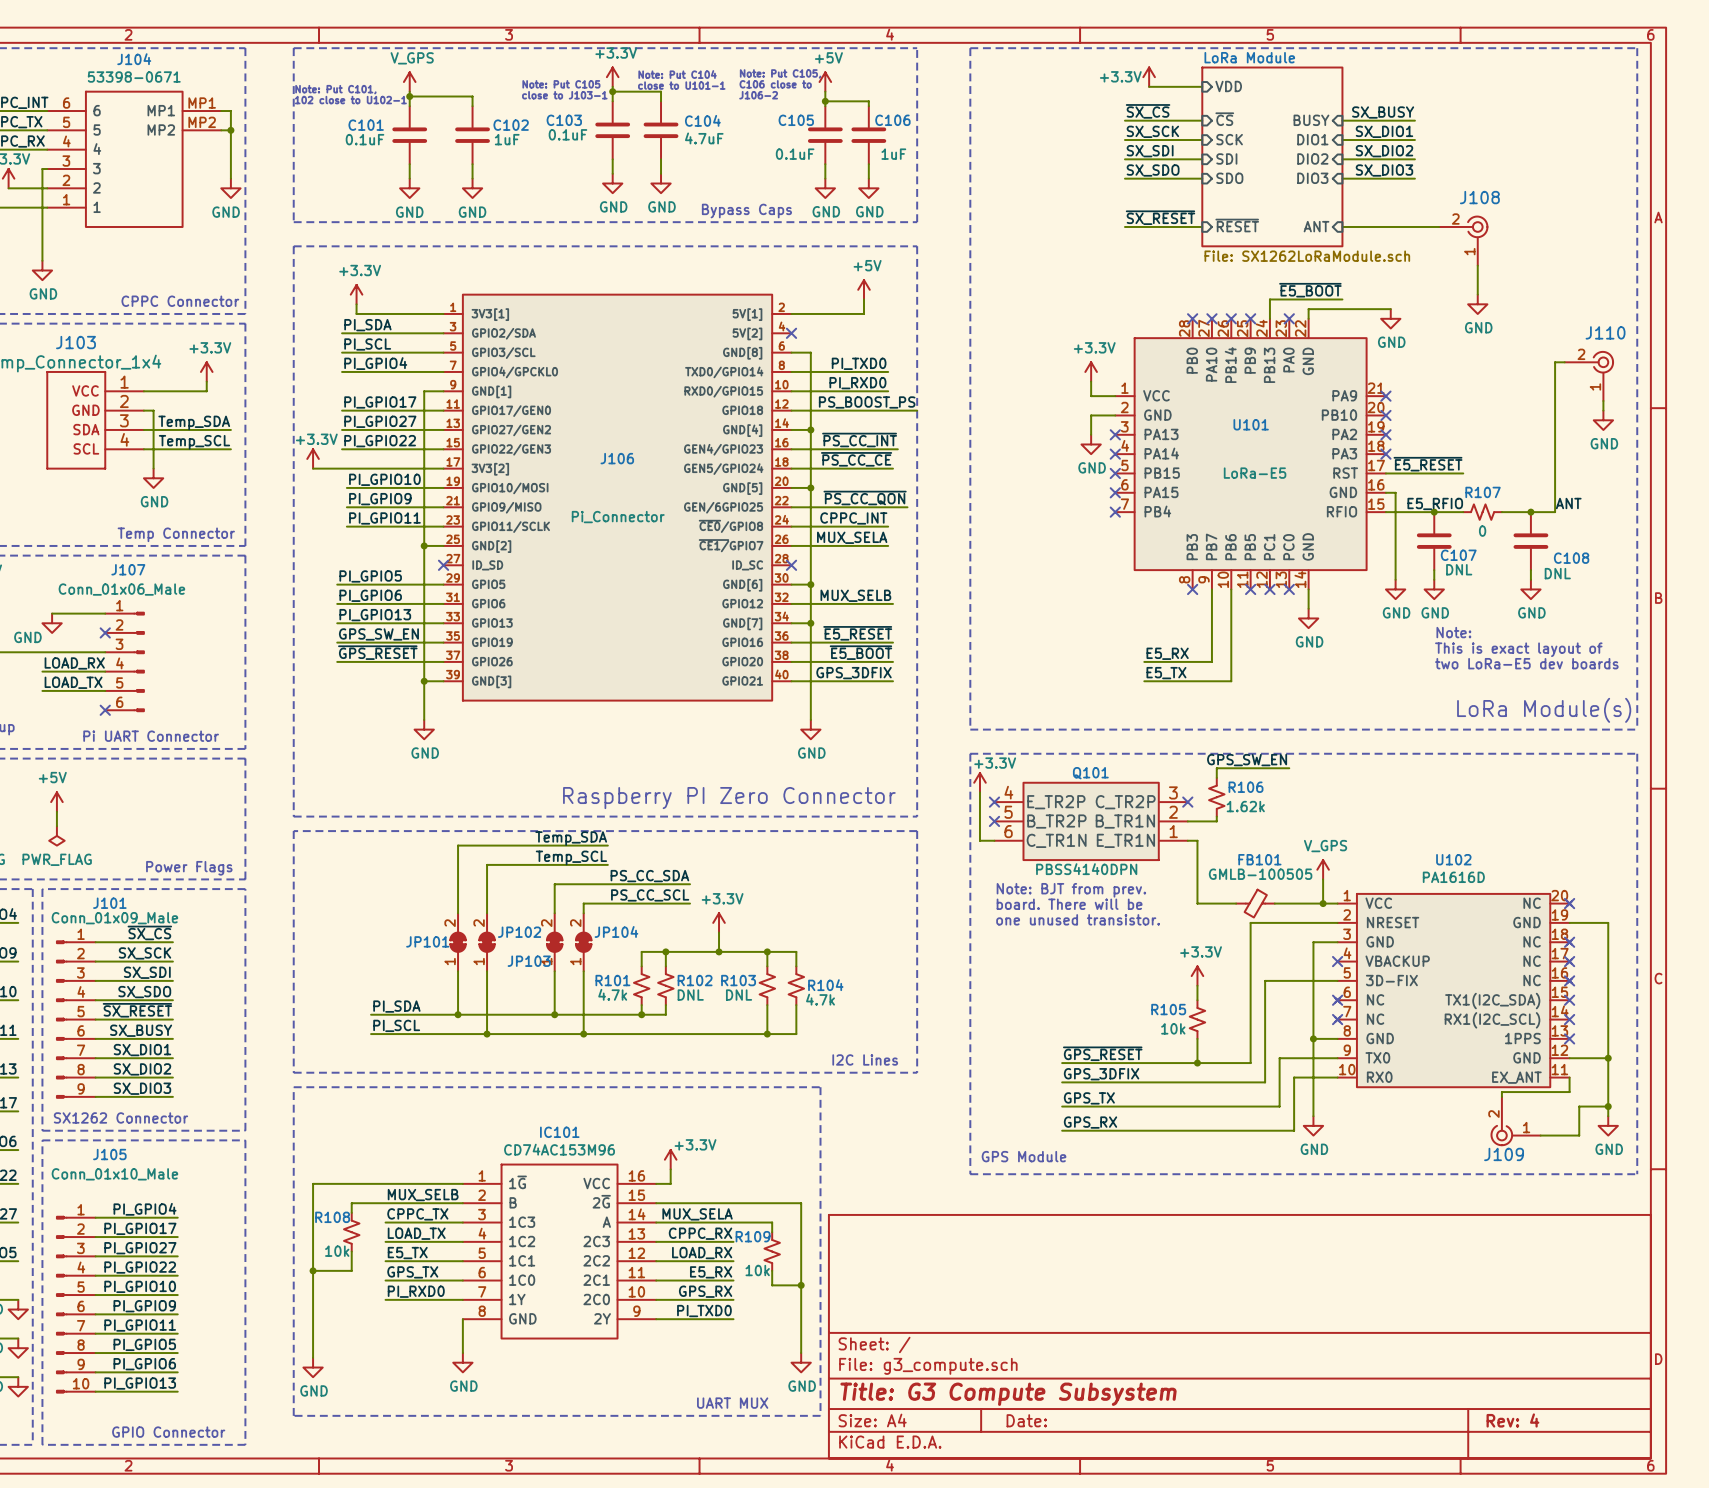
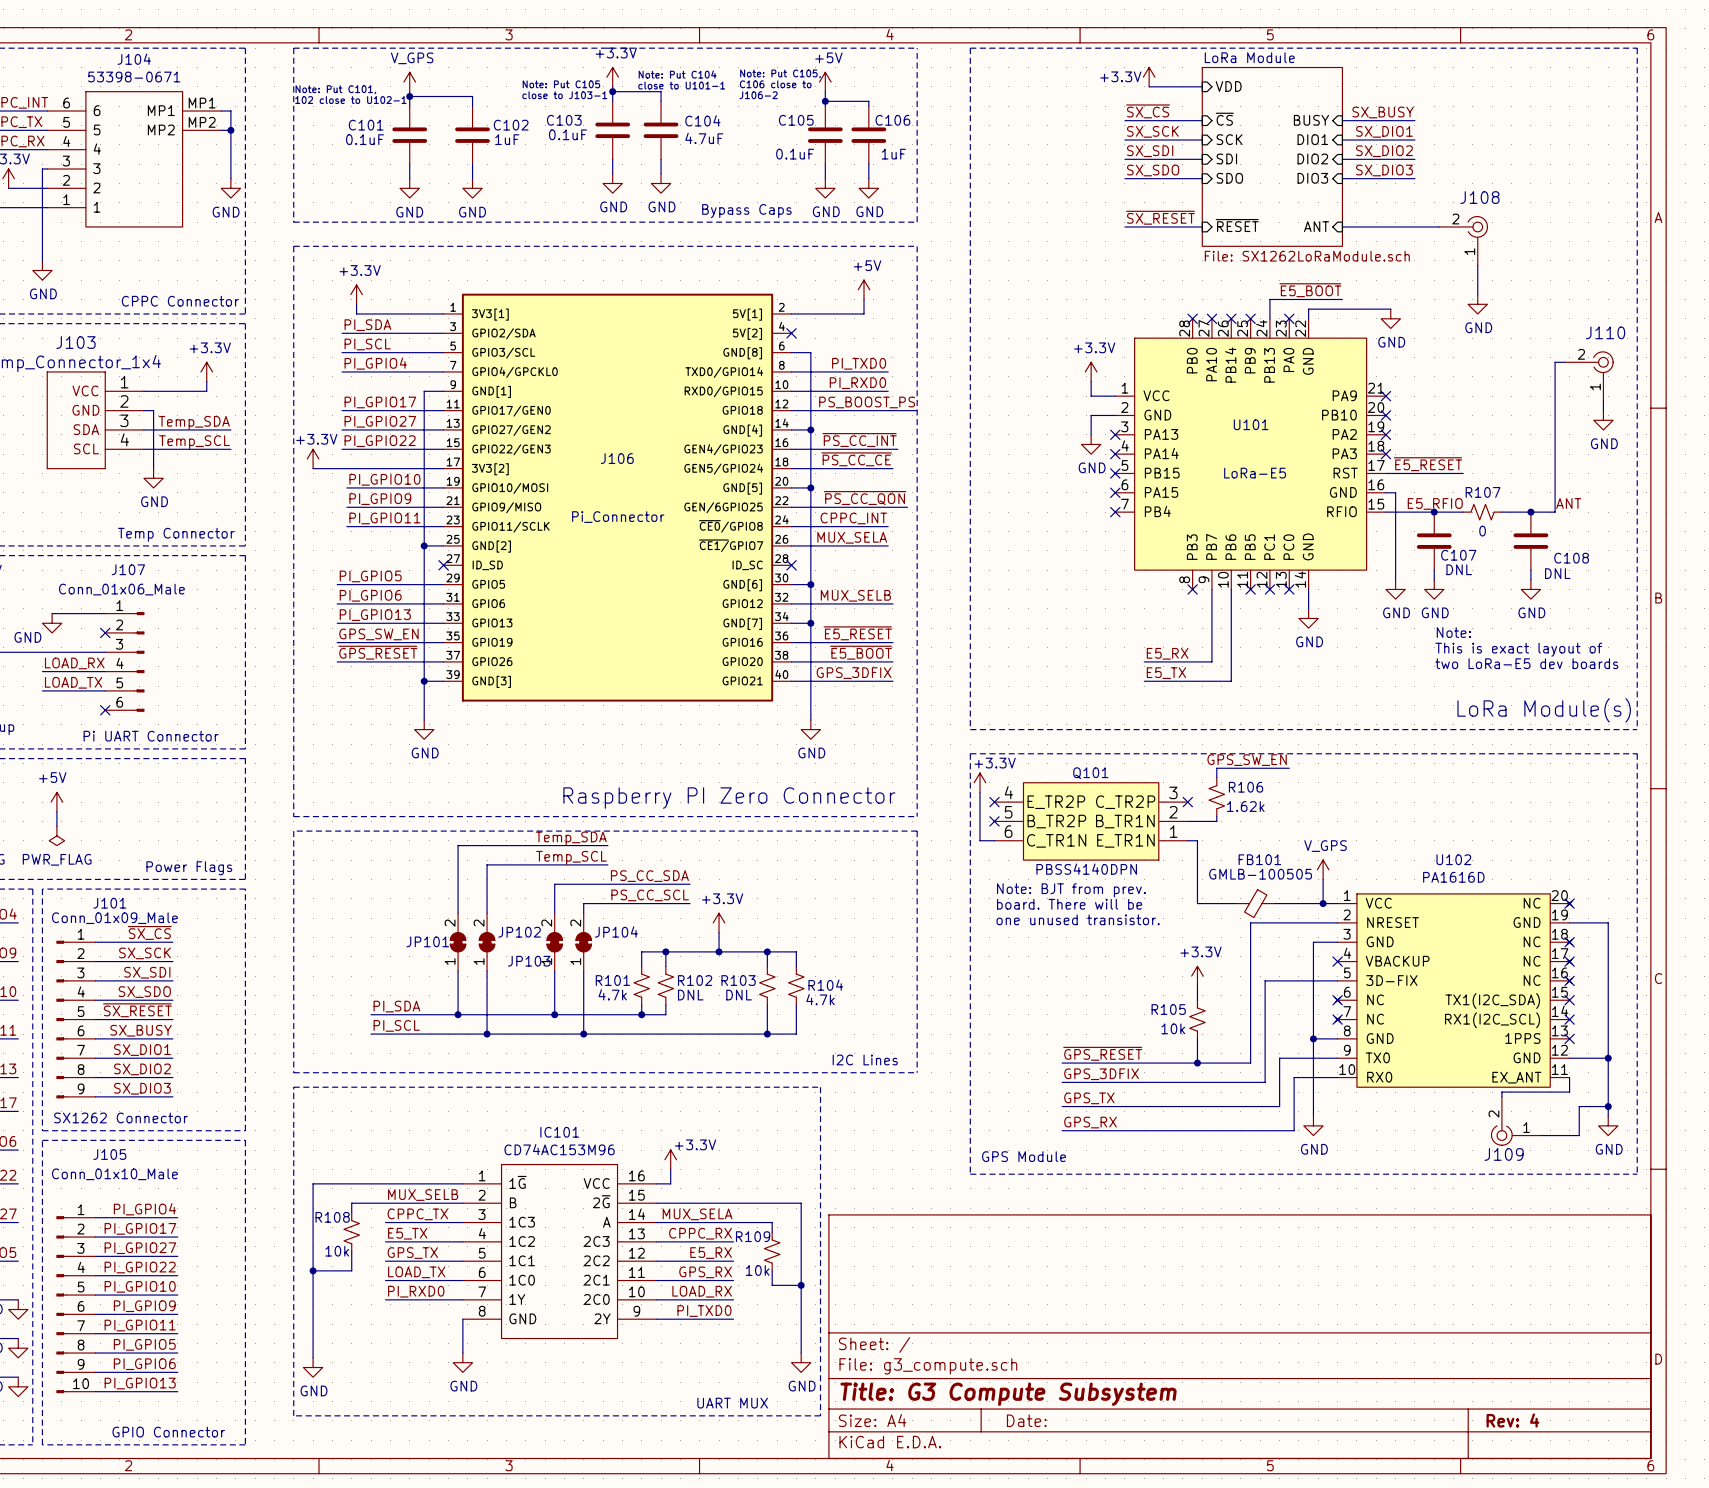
label: LOAD_TX (416, 1233) -> E5_TX (407, 1233)
label: E5_TX (407, 1253) -> GPS_TX (412, 1253)
label: LOAD_RX (702, 1253) -> E5_RX (711, 1253)
label: GPS_TX (412, 1272) -> LOAD_TX (416, 1272)
label: E5_RX (711, 1272) -> GPS_RX (705, 1272)
label: GPS_RX (705, 1291) -> LOAD_RX (702, 1291)

